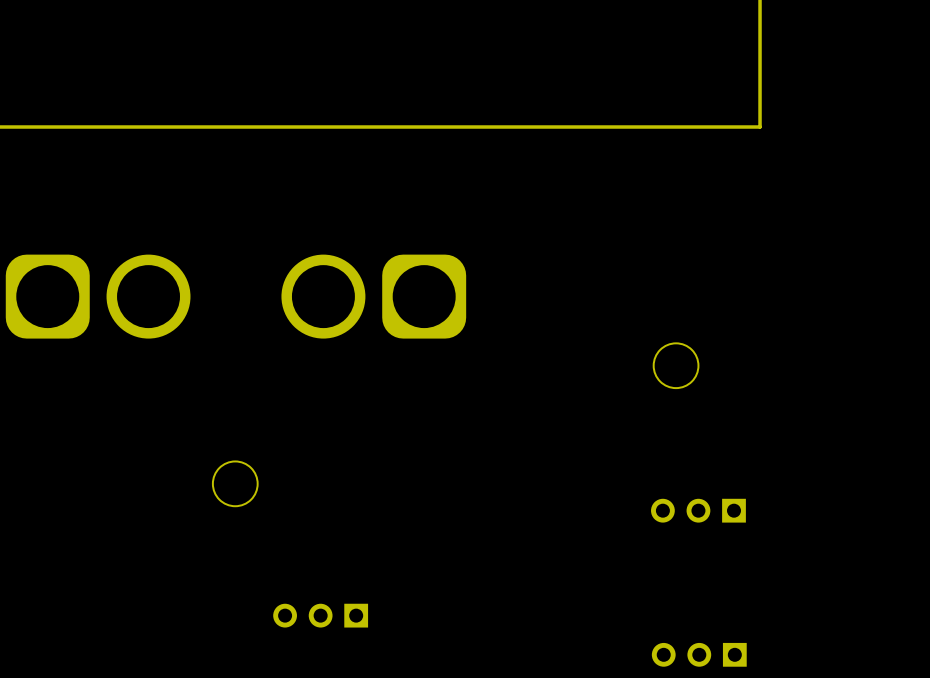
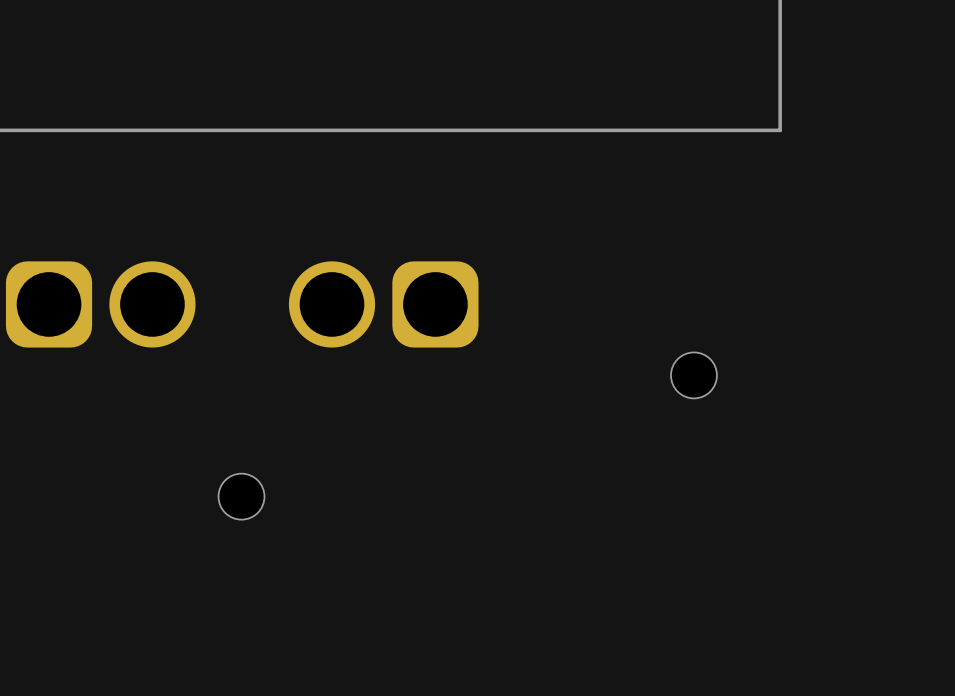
part: (698, 510) -> none
part: (320, 615) -> none
part: (699, 654) -> none

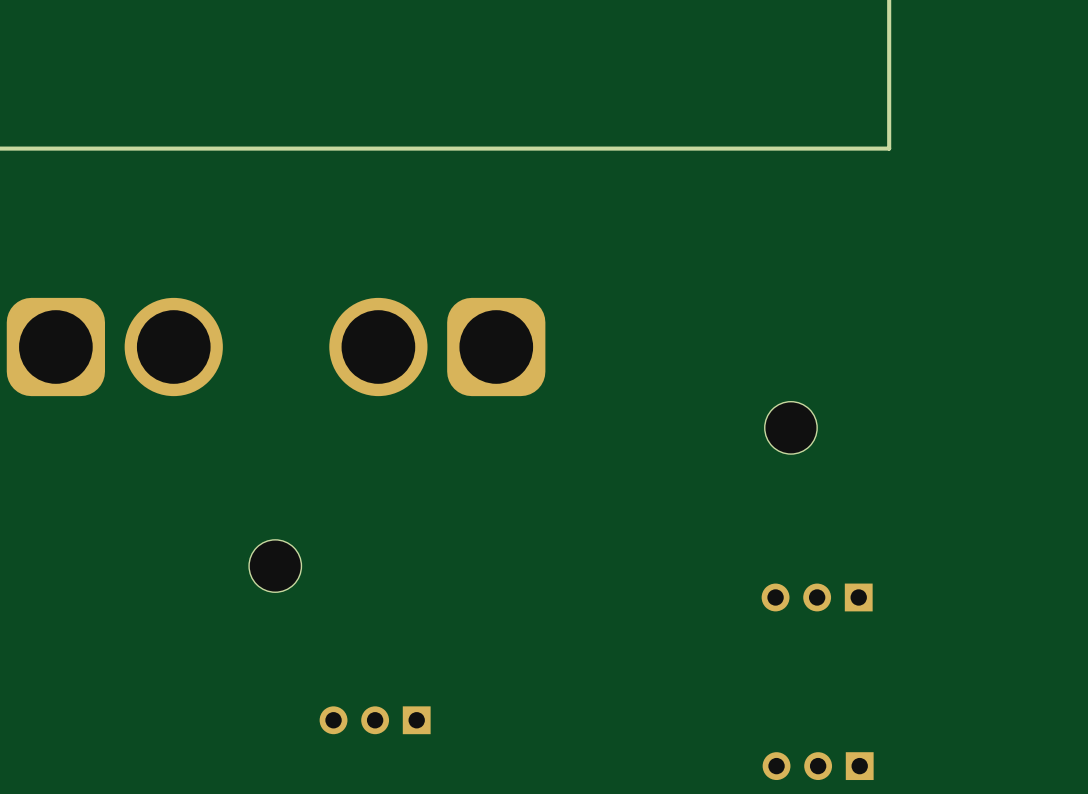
part: none -> (817, 597)
part: none -> (375, 720)
part: none -> (818, 766)

